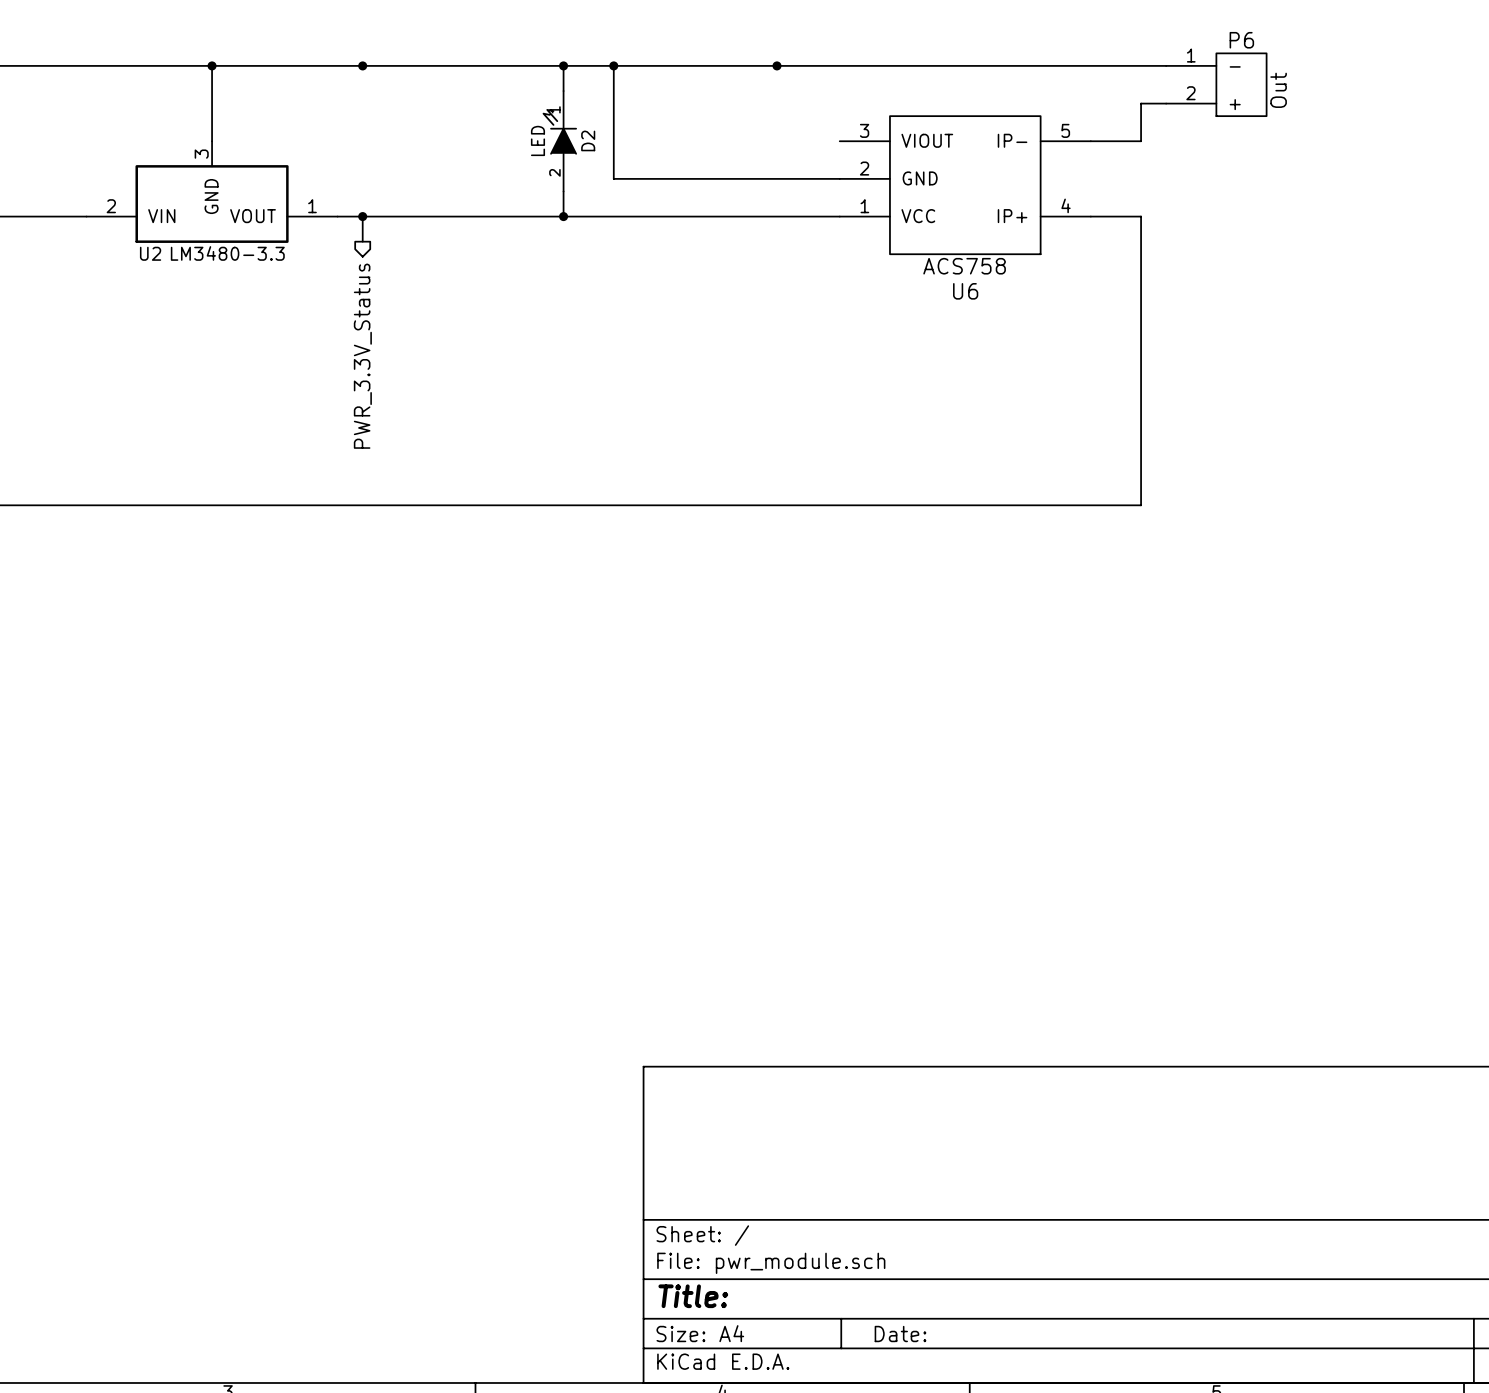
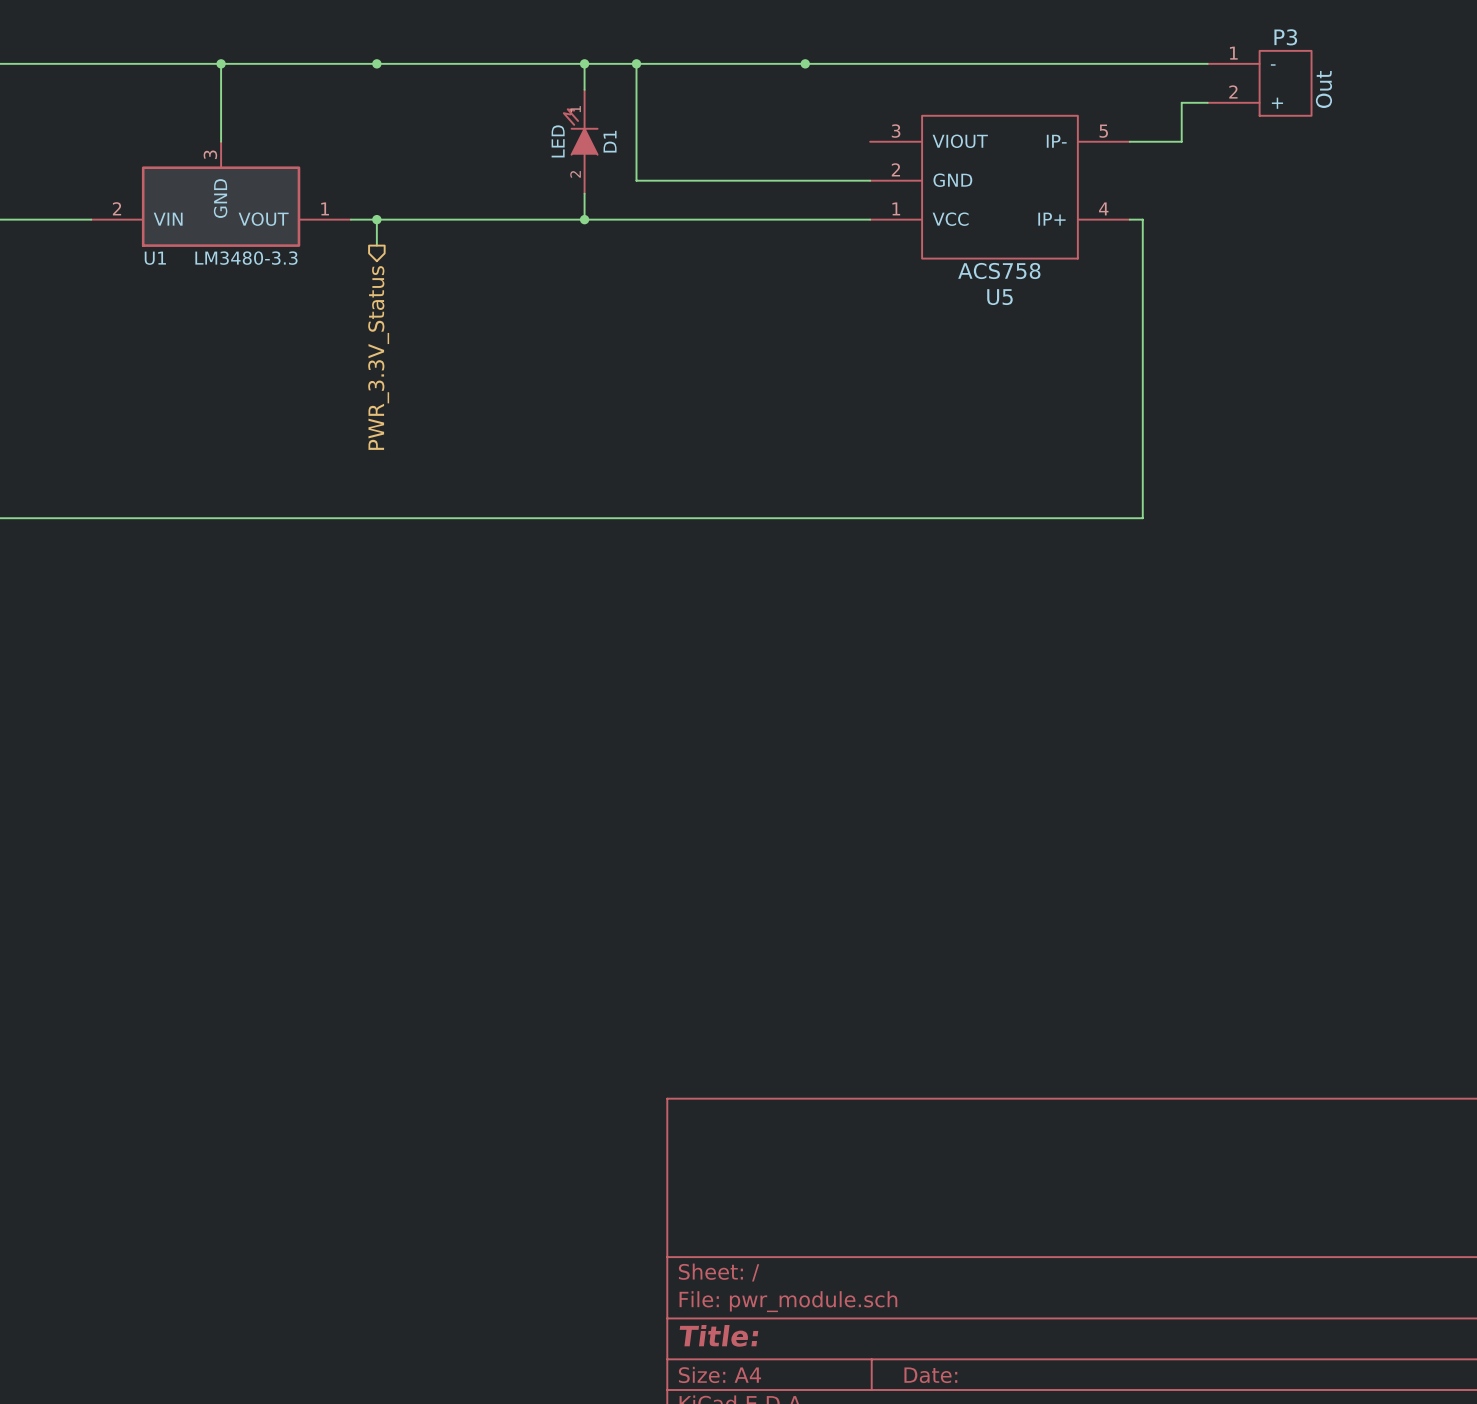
P6 name: P6 (1241, 40) -> P3 (1285, 37)
D2 name: D2 (588, 140) -> D1 (610, 141)
wire: (1103, 216) (1141, 216) (1141, 505) (1103, 505) -> (1142, 219) (1142, 518)
U2 name: U2 (150, 253) -> U1 (155, 258)
U6 name: U6 (965, 291) -> U5 (999, 297)

